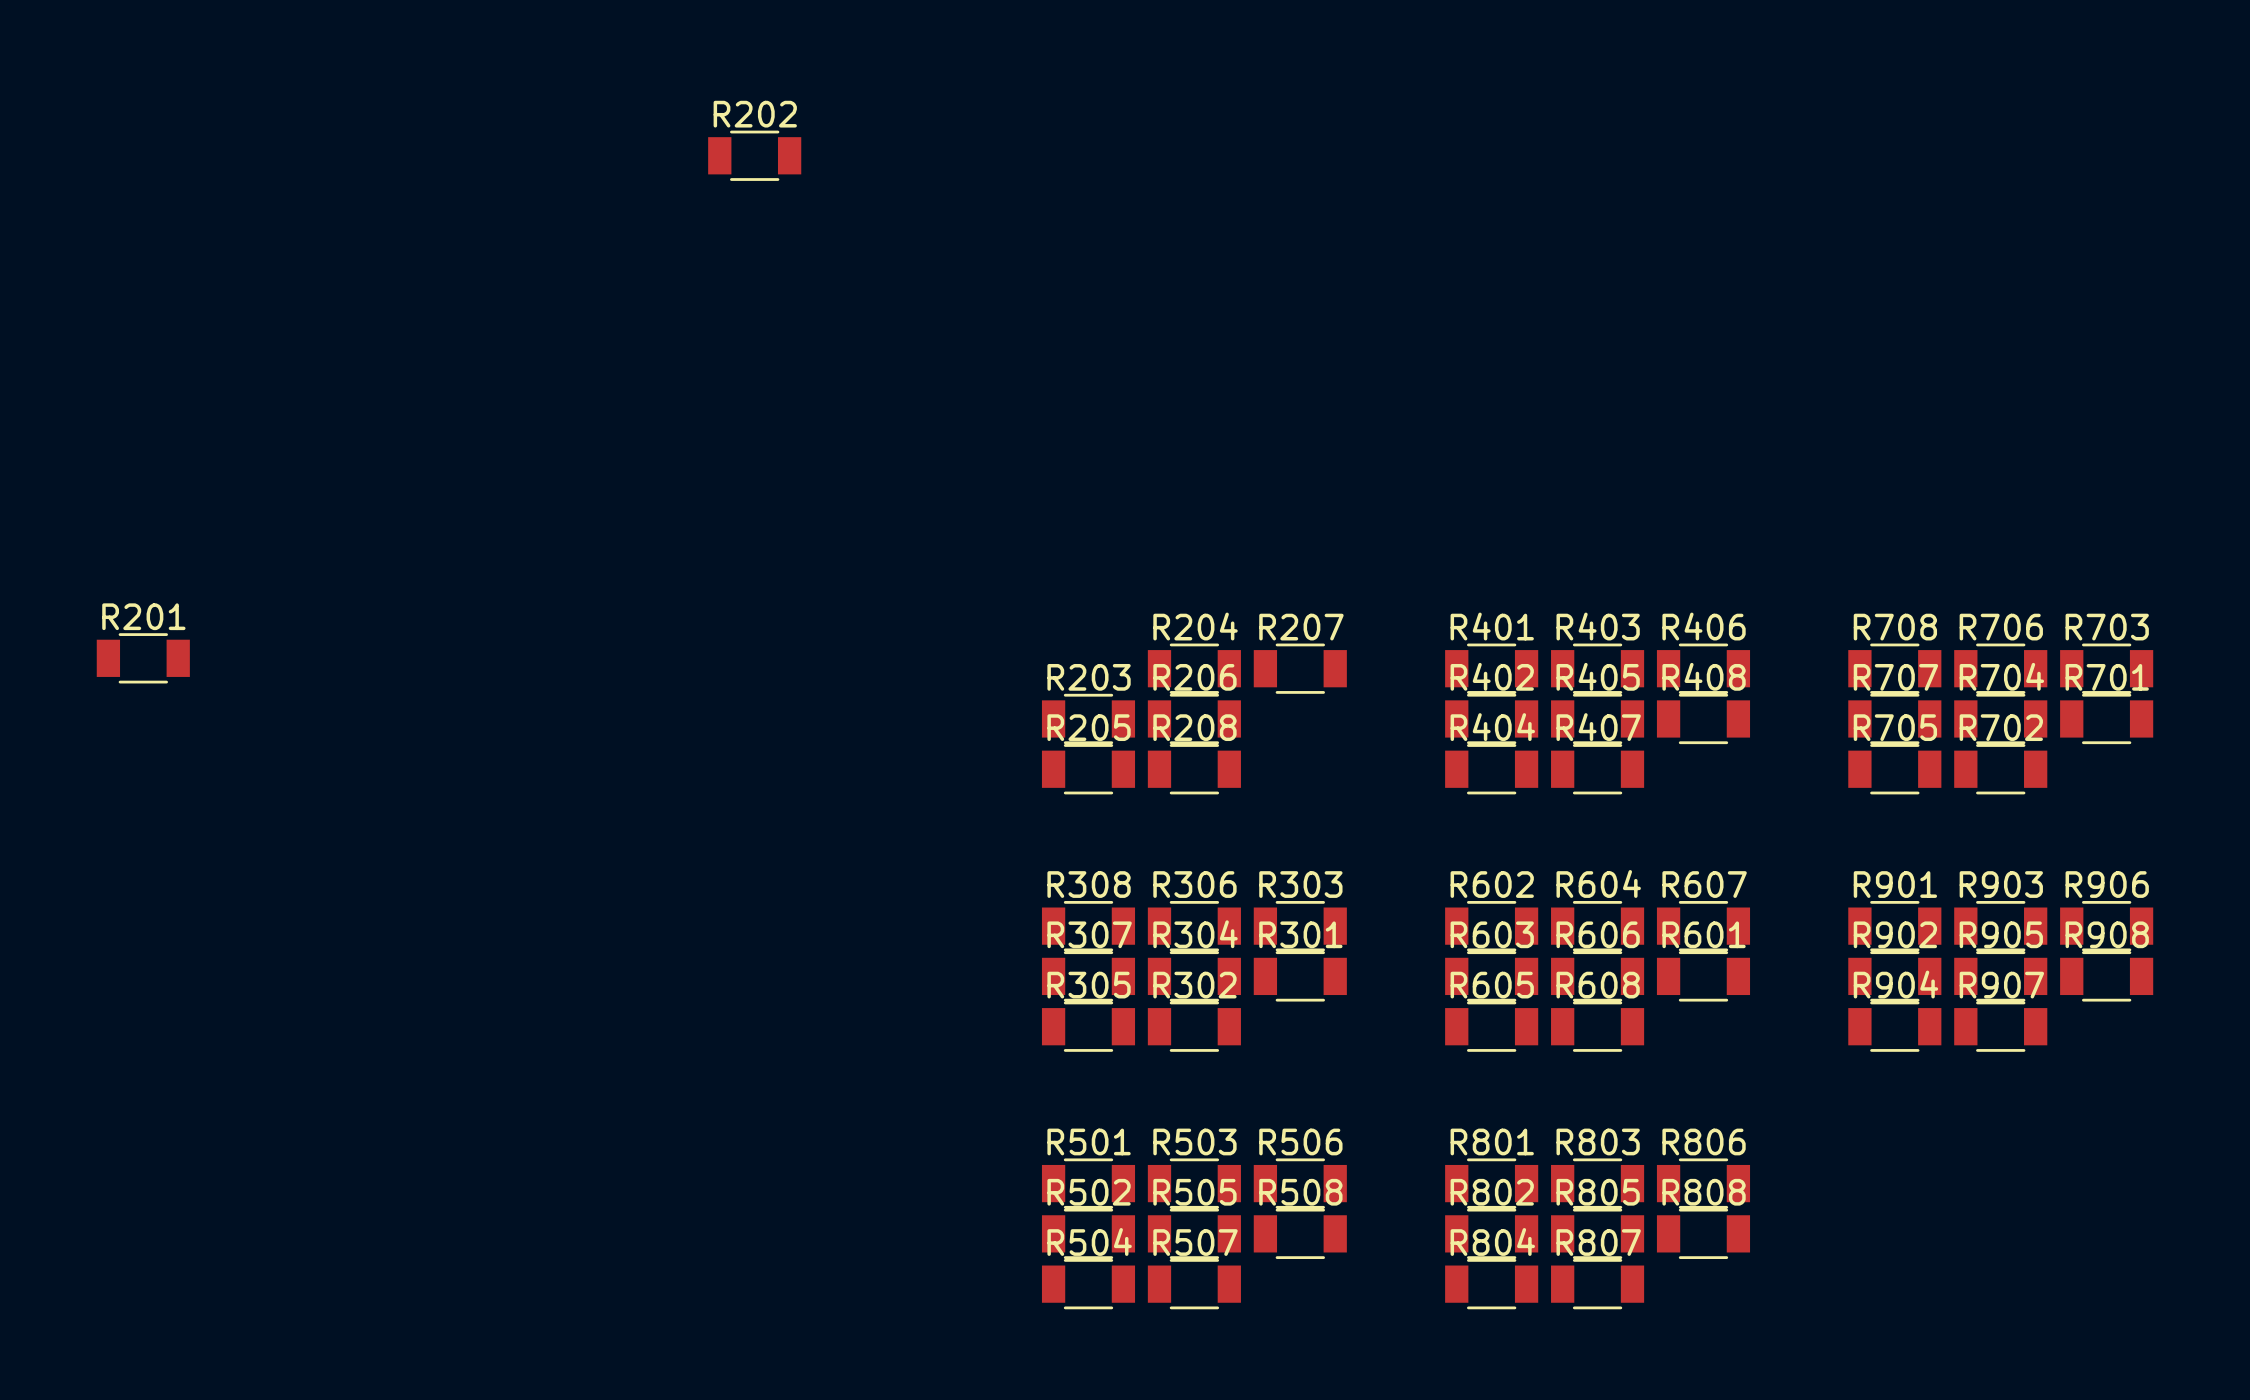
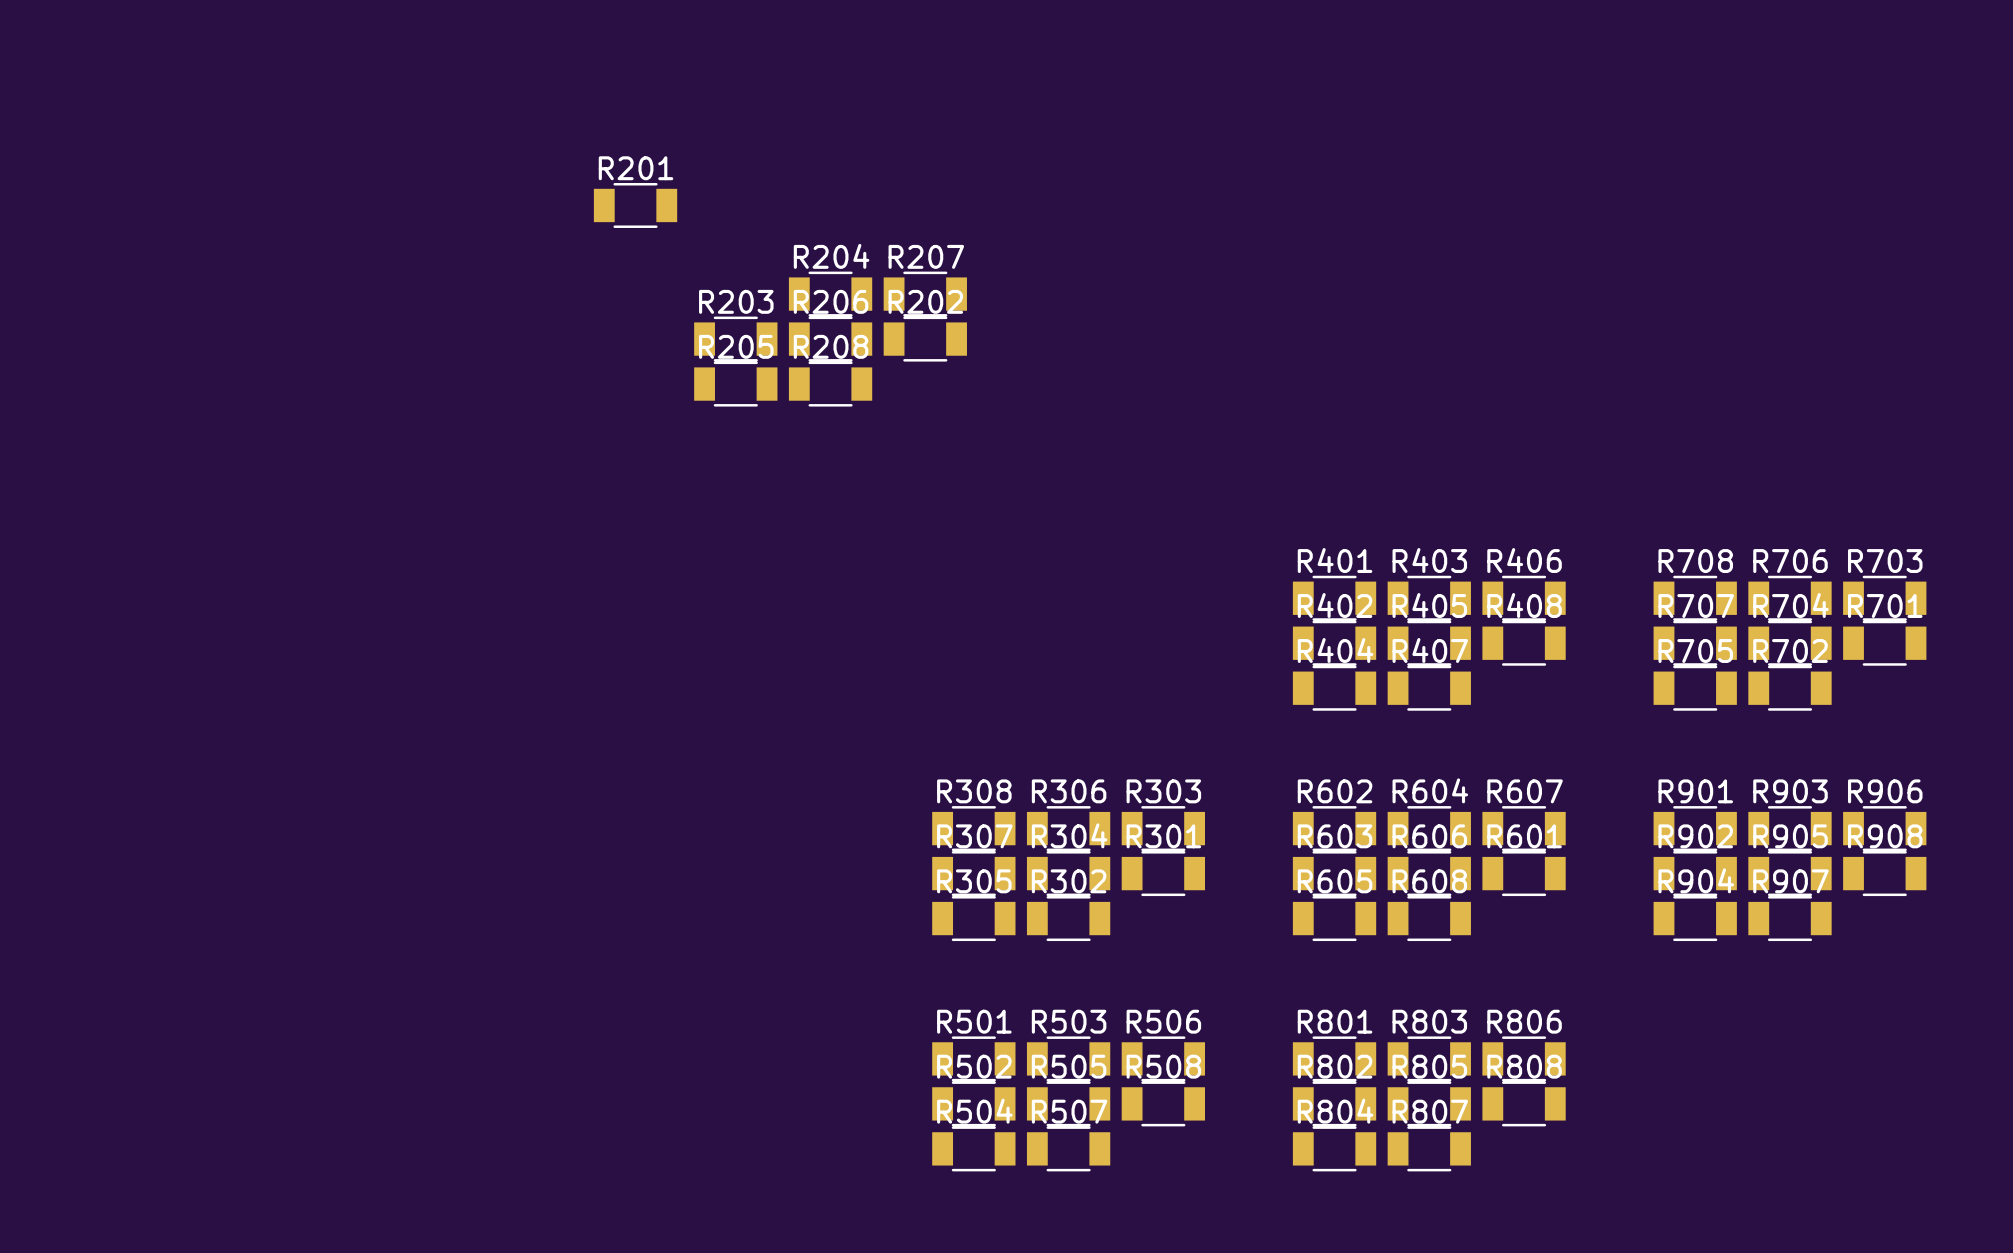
R202 position: (754, 155) -> (925, 339)
R201 position: (143, 658) -> (635, 205)
R204 position: (1194, 668) -> (830, 294)
R207 position: (1300, 668) -> (925, 294)
R203 position: (1088, 718) -> (735, 339)
R206 position: (1194, 718) -> (830, 339)
R205 position: (1088, 769) -> (735, 384)
R208 position: (1194, 769) -> (830, 384)

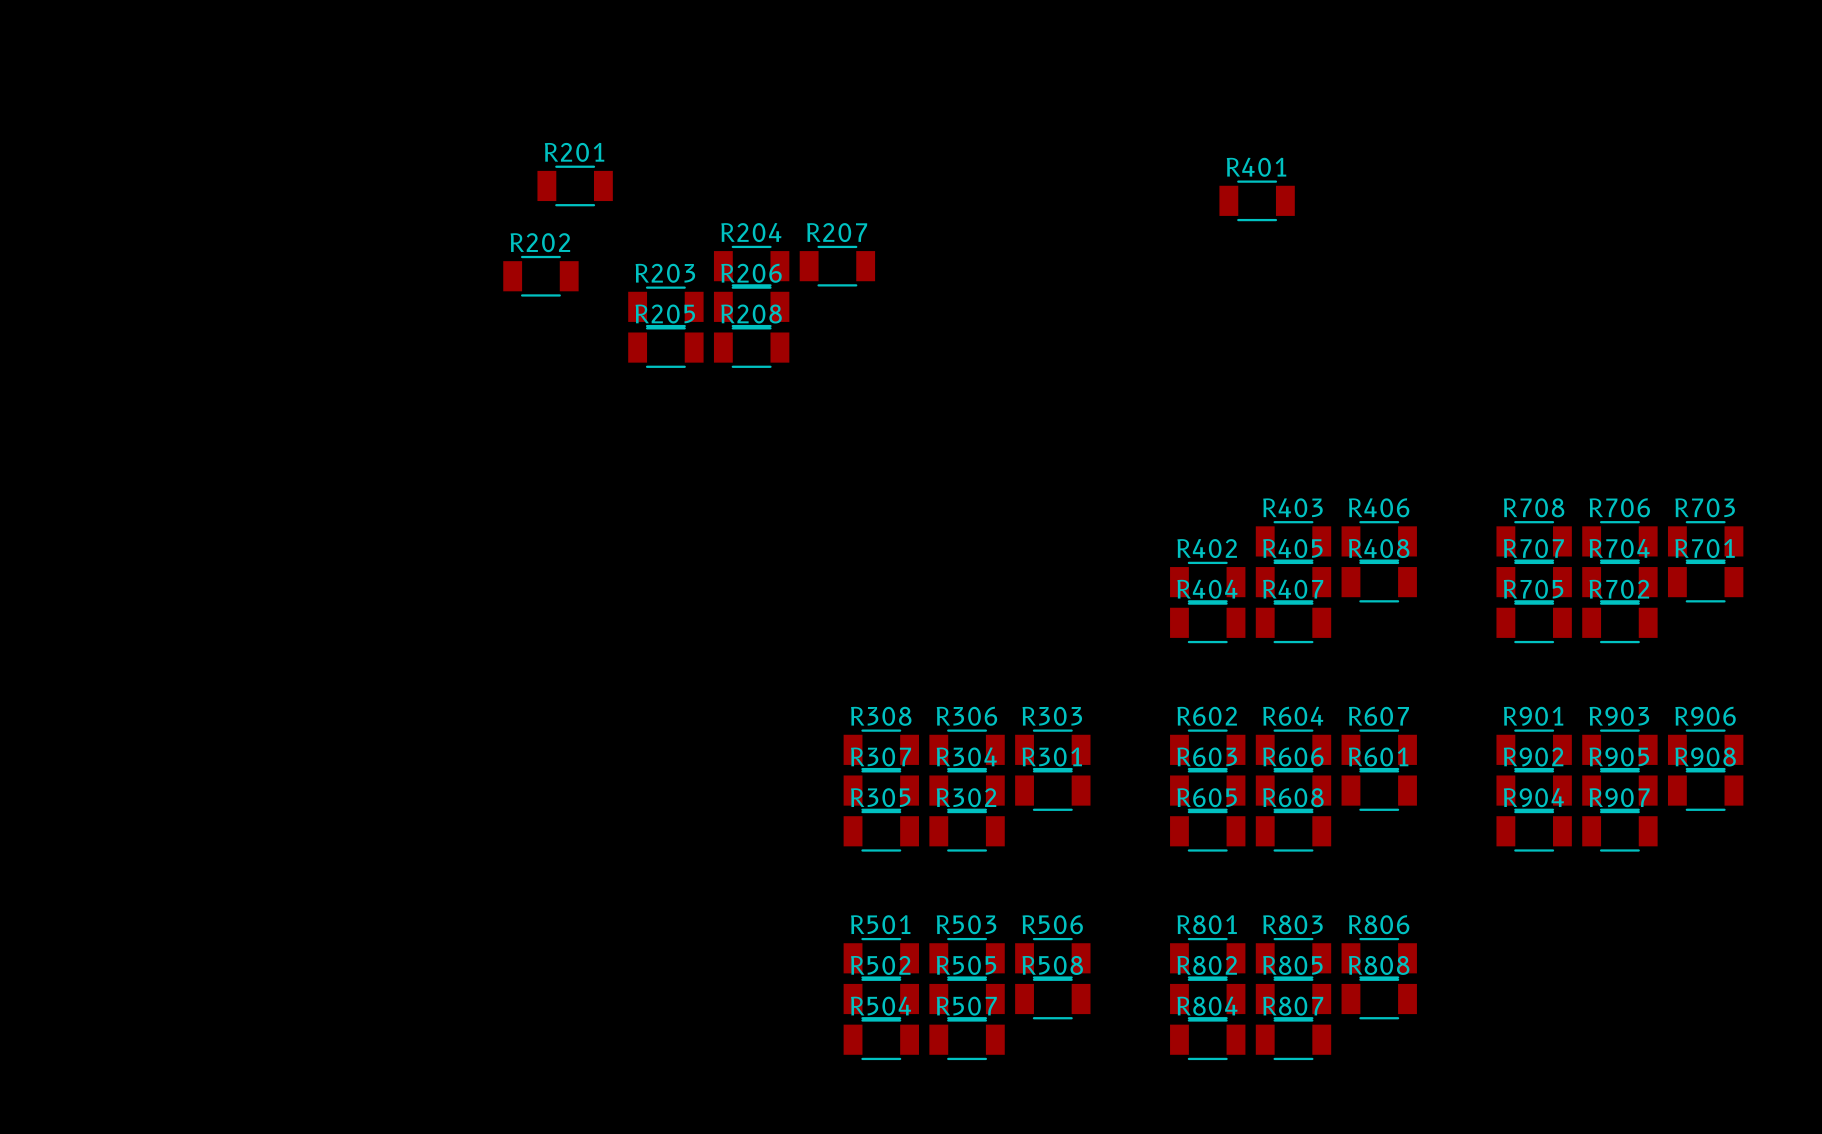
R202 position: (925, 339) -> (540, 276)
R401 position: (1334, 598) -> (1257, 200)

